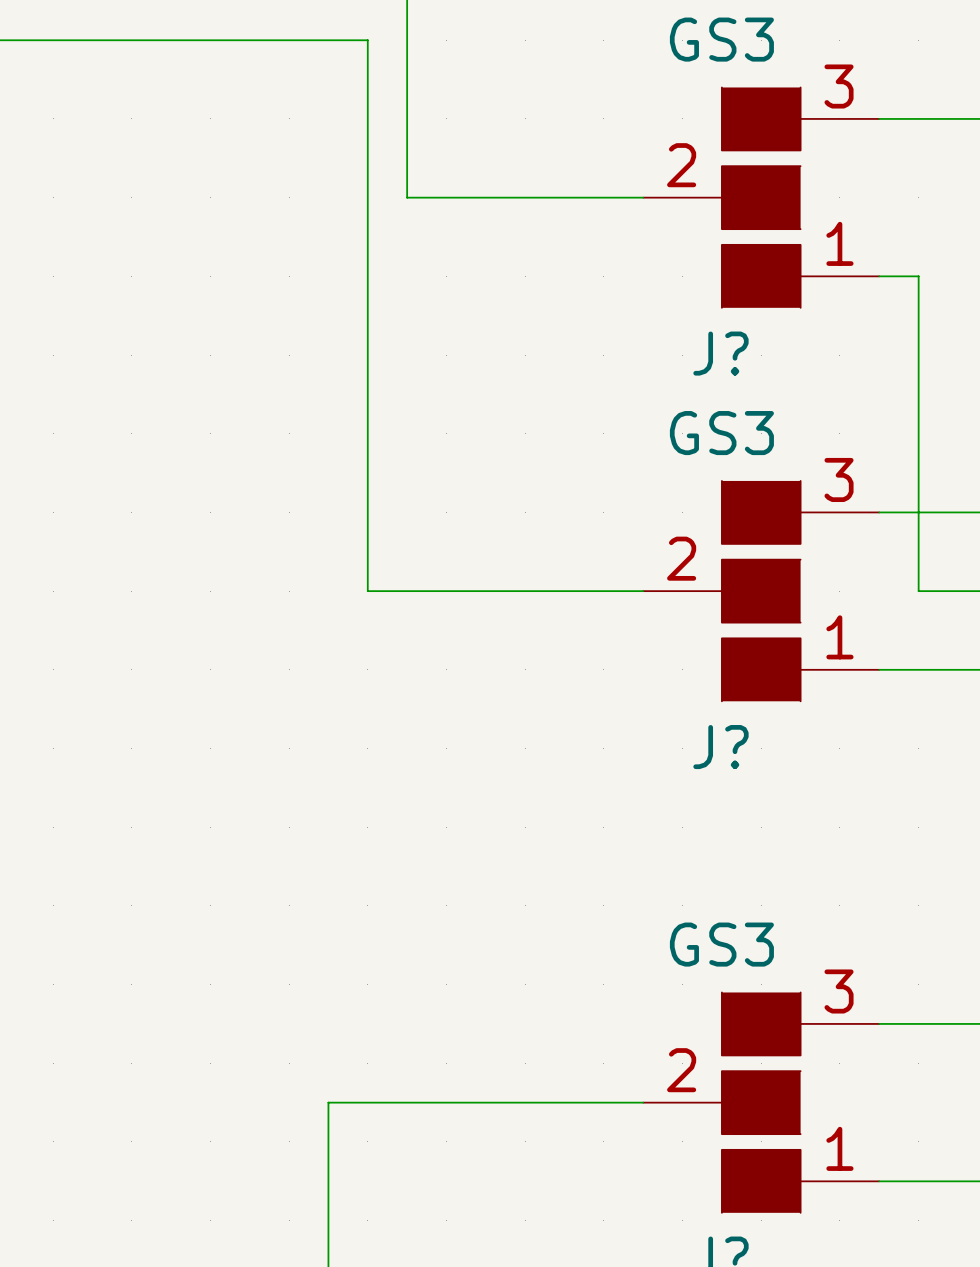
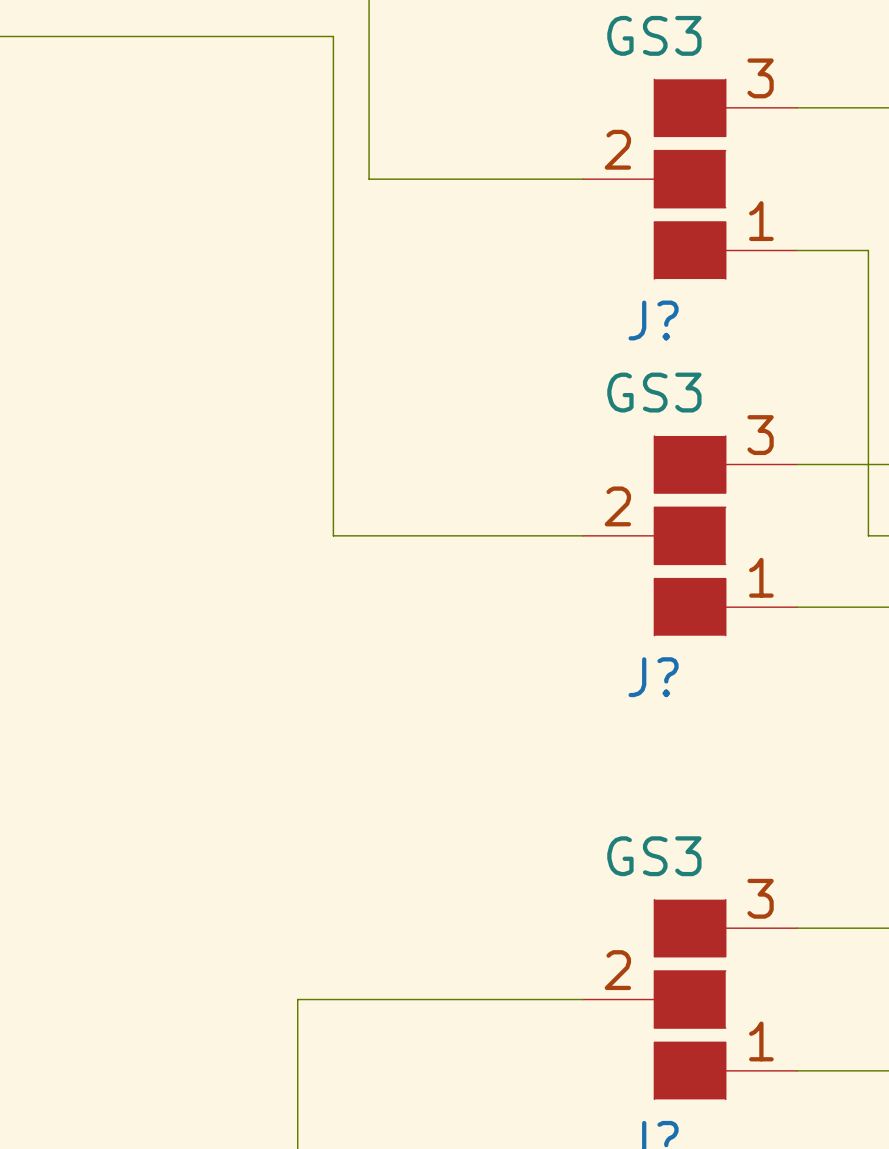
wire: (918, 276) (918, 591) (957, 591) -> (832, 250) (868, 250) (868, 535)

